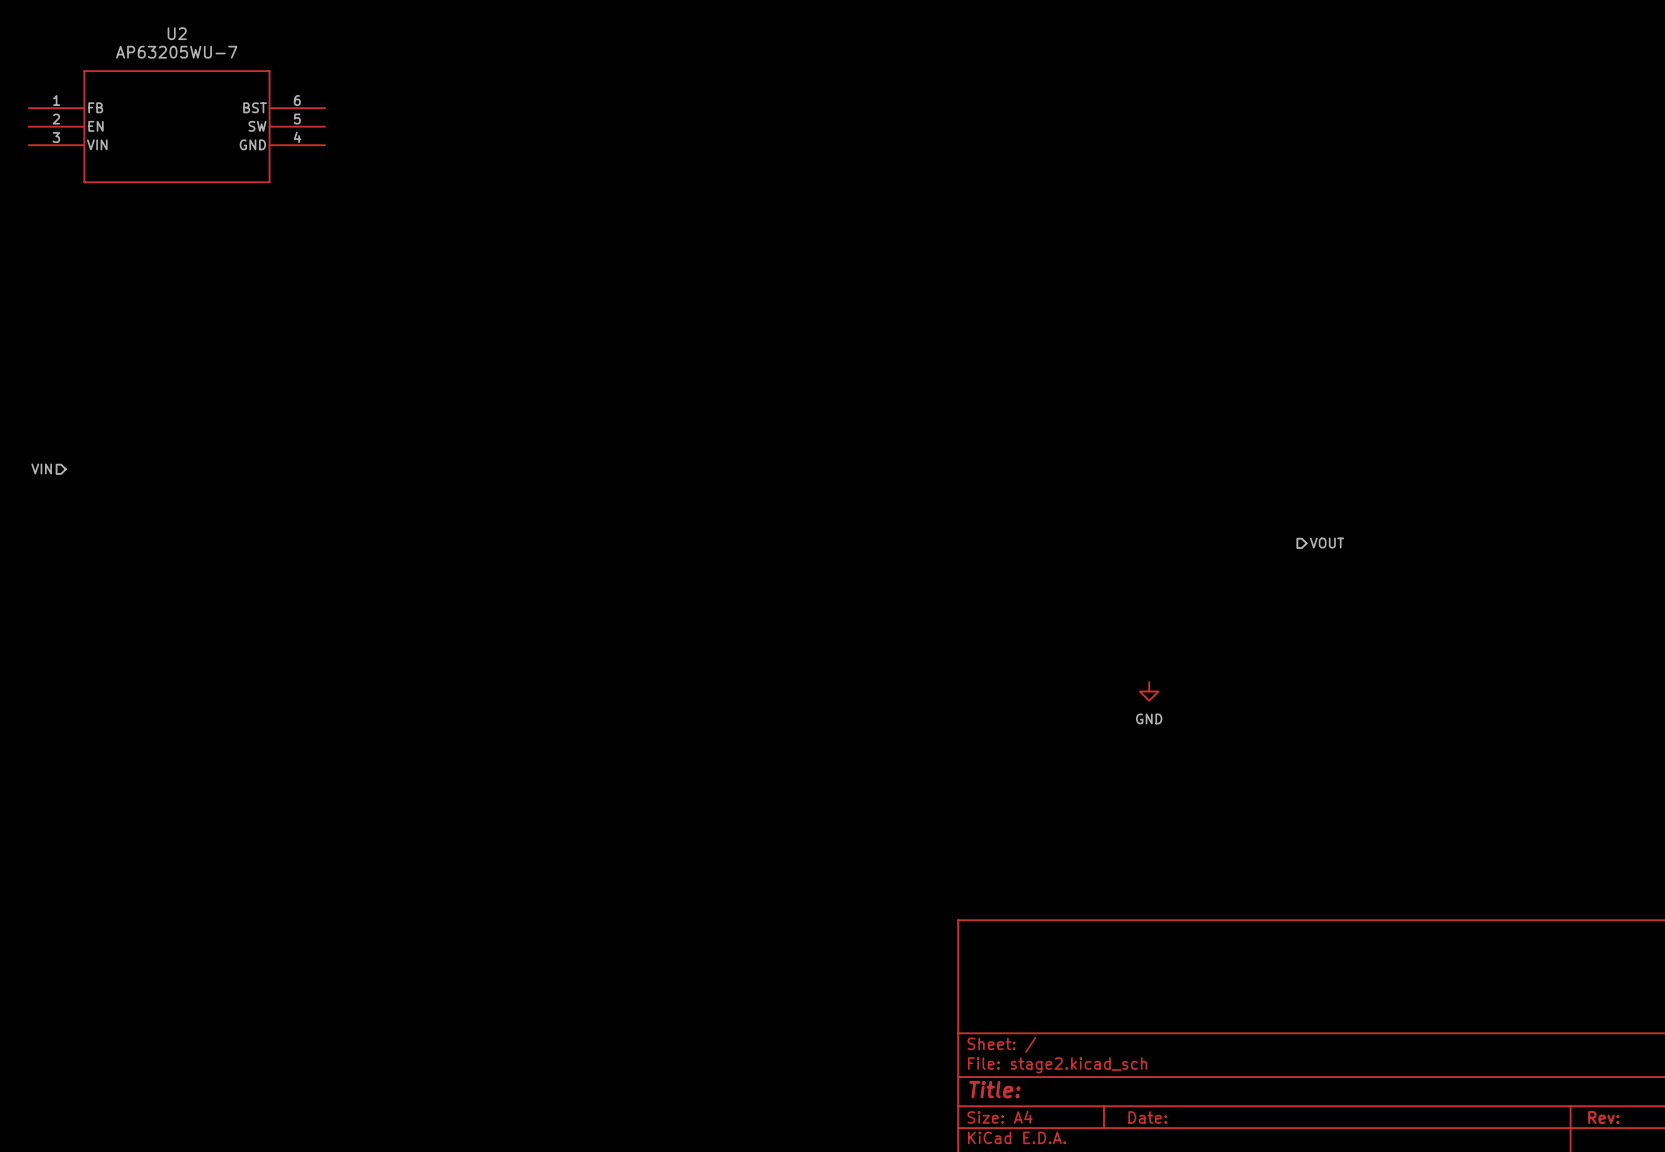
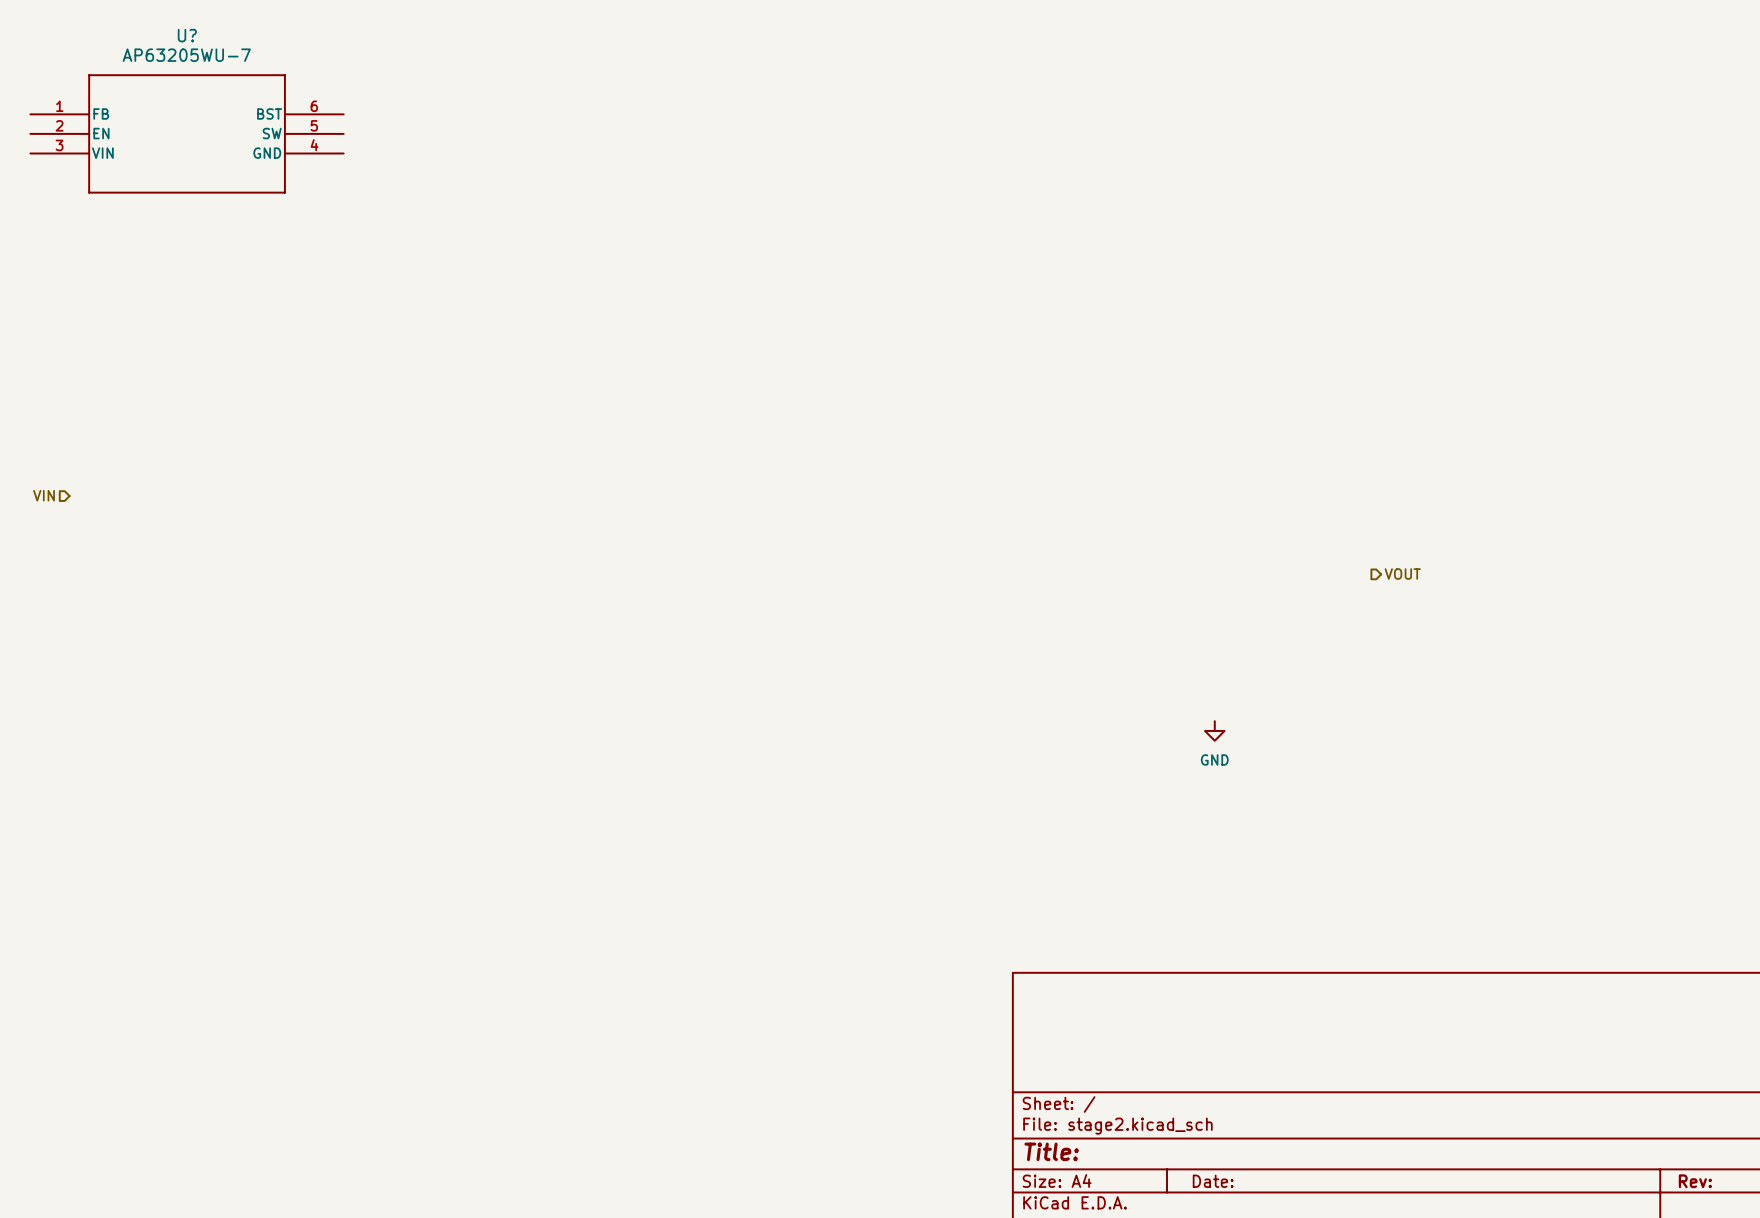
U2 name: U2 (177, 33) -> U? (187, 35)

